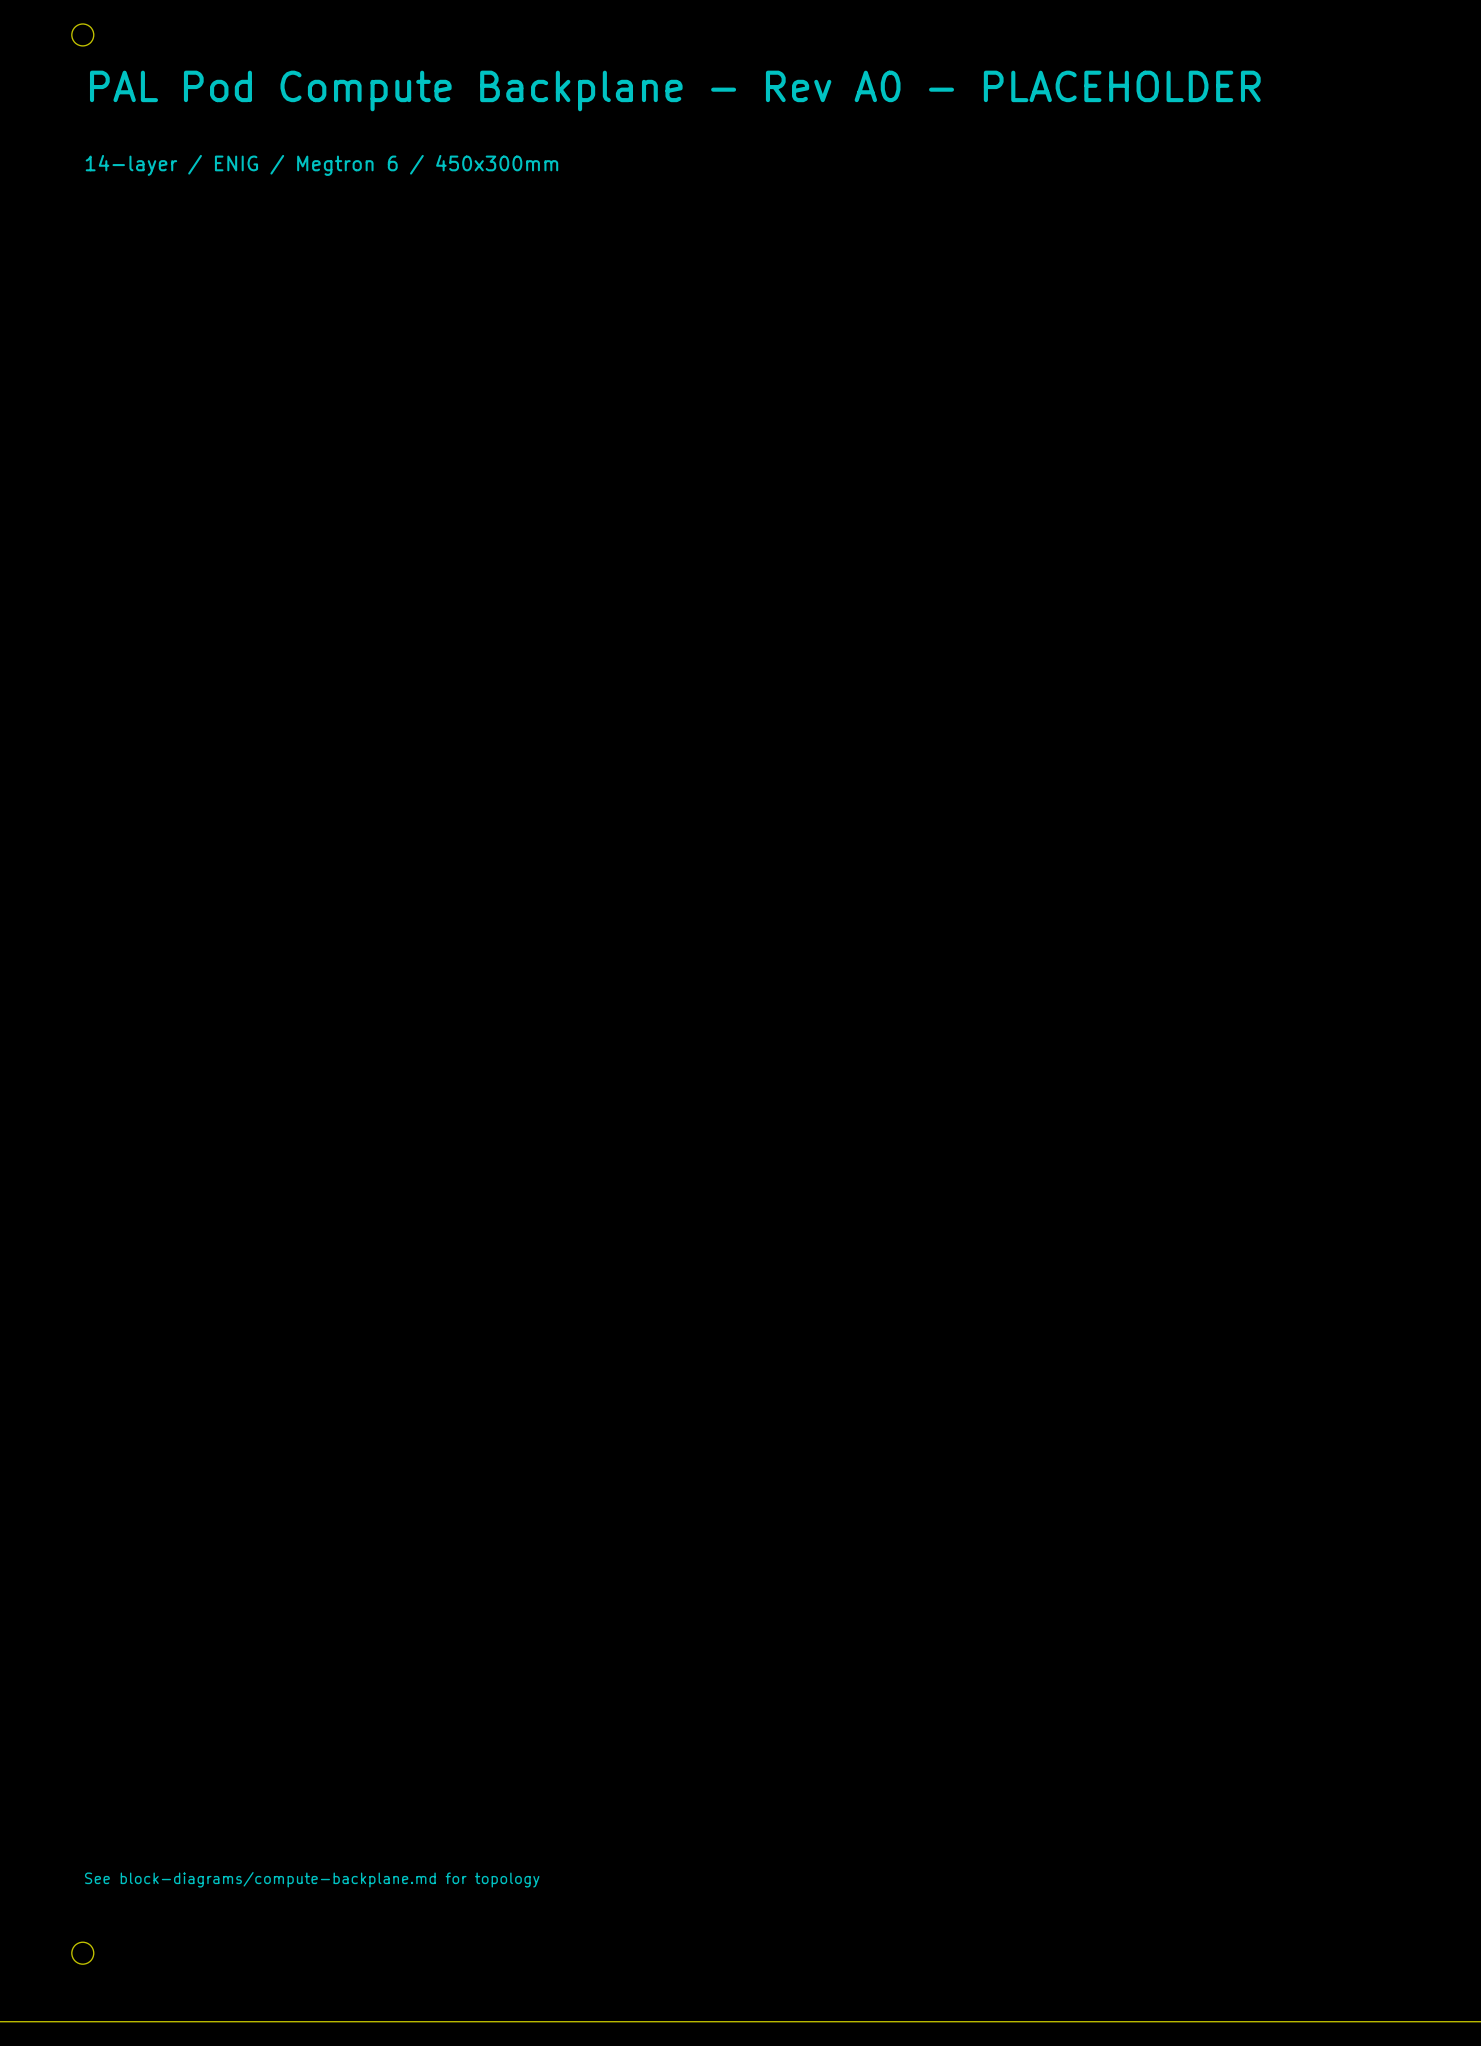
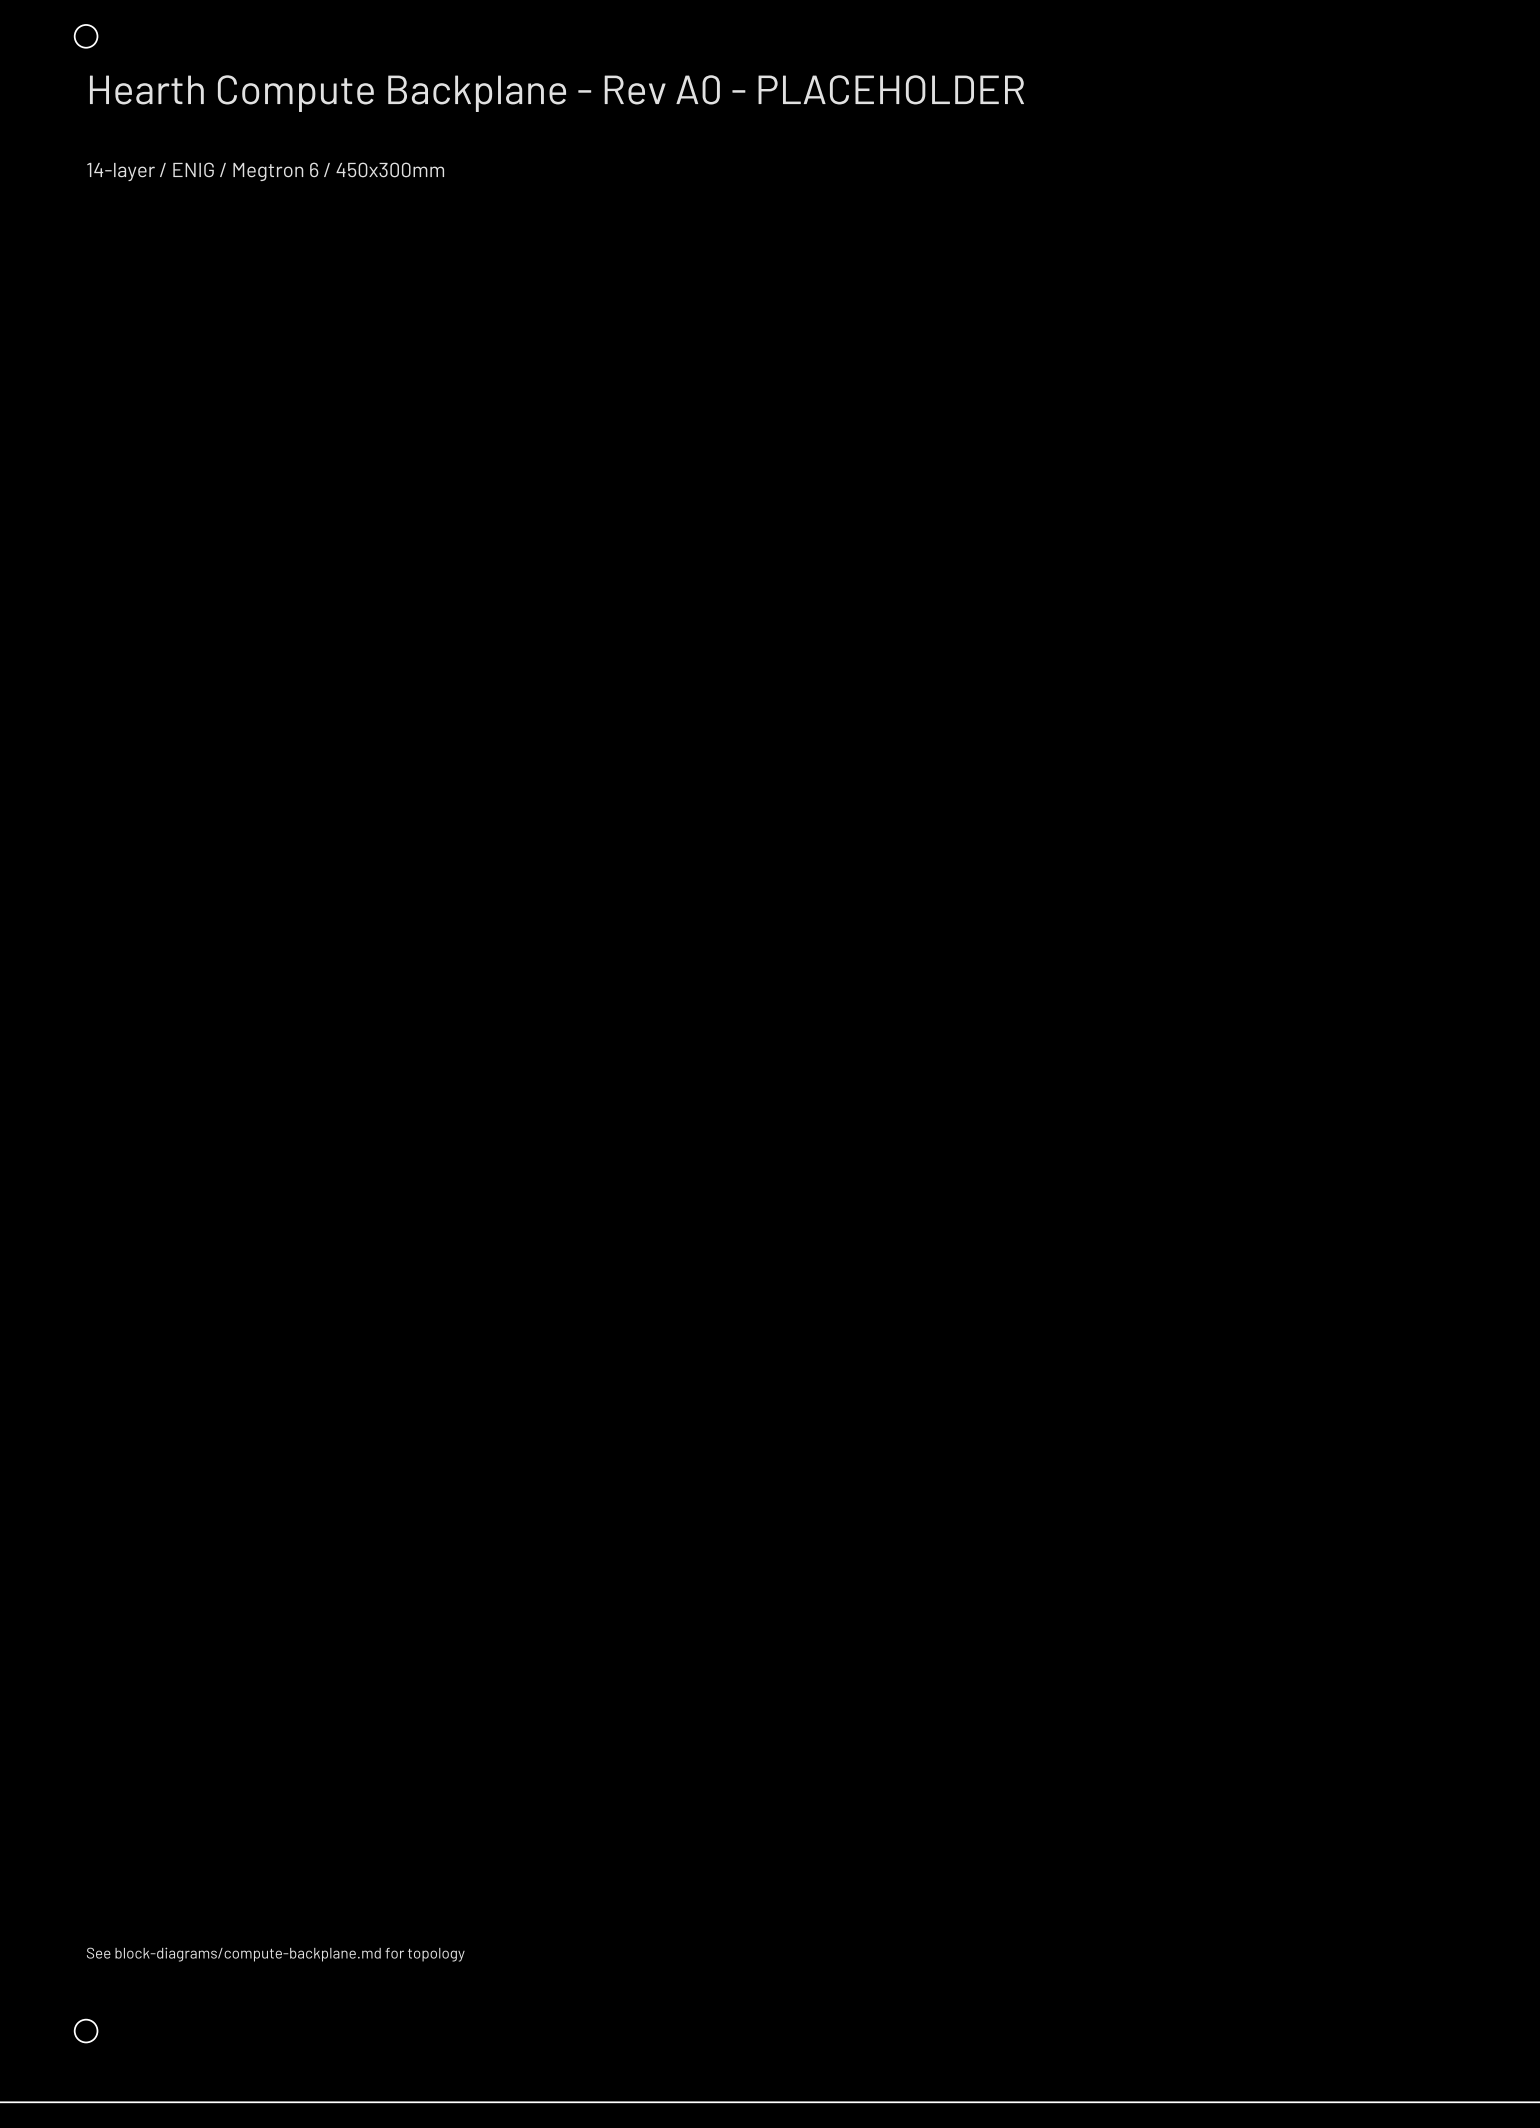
text: PAL Pod Compute Backplane - Rev A0 - PLACEHOLDER (675, 90) -> Hearth Compute Backplane - Rev A0 - PLACEHOLDER (557, 93)

